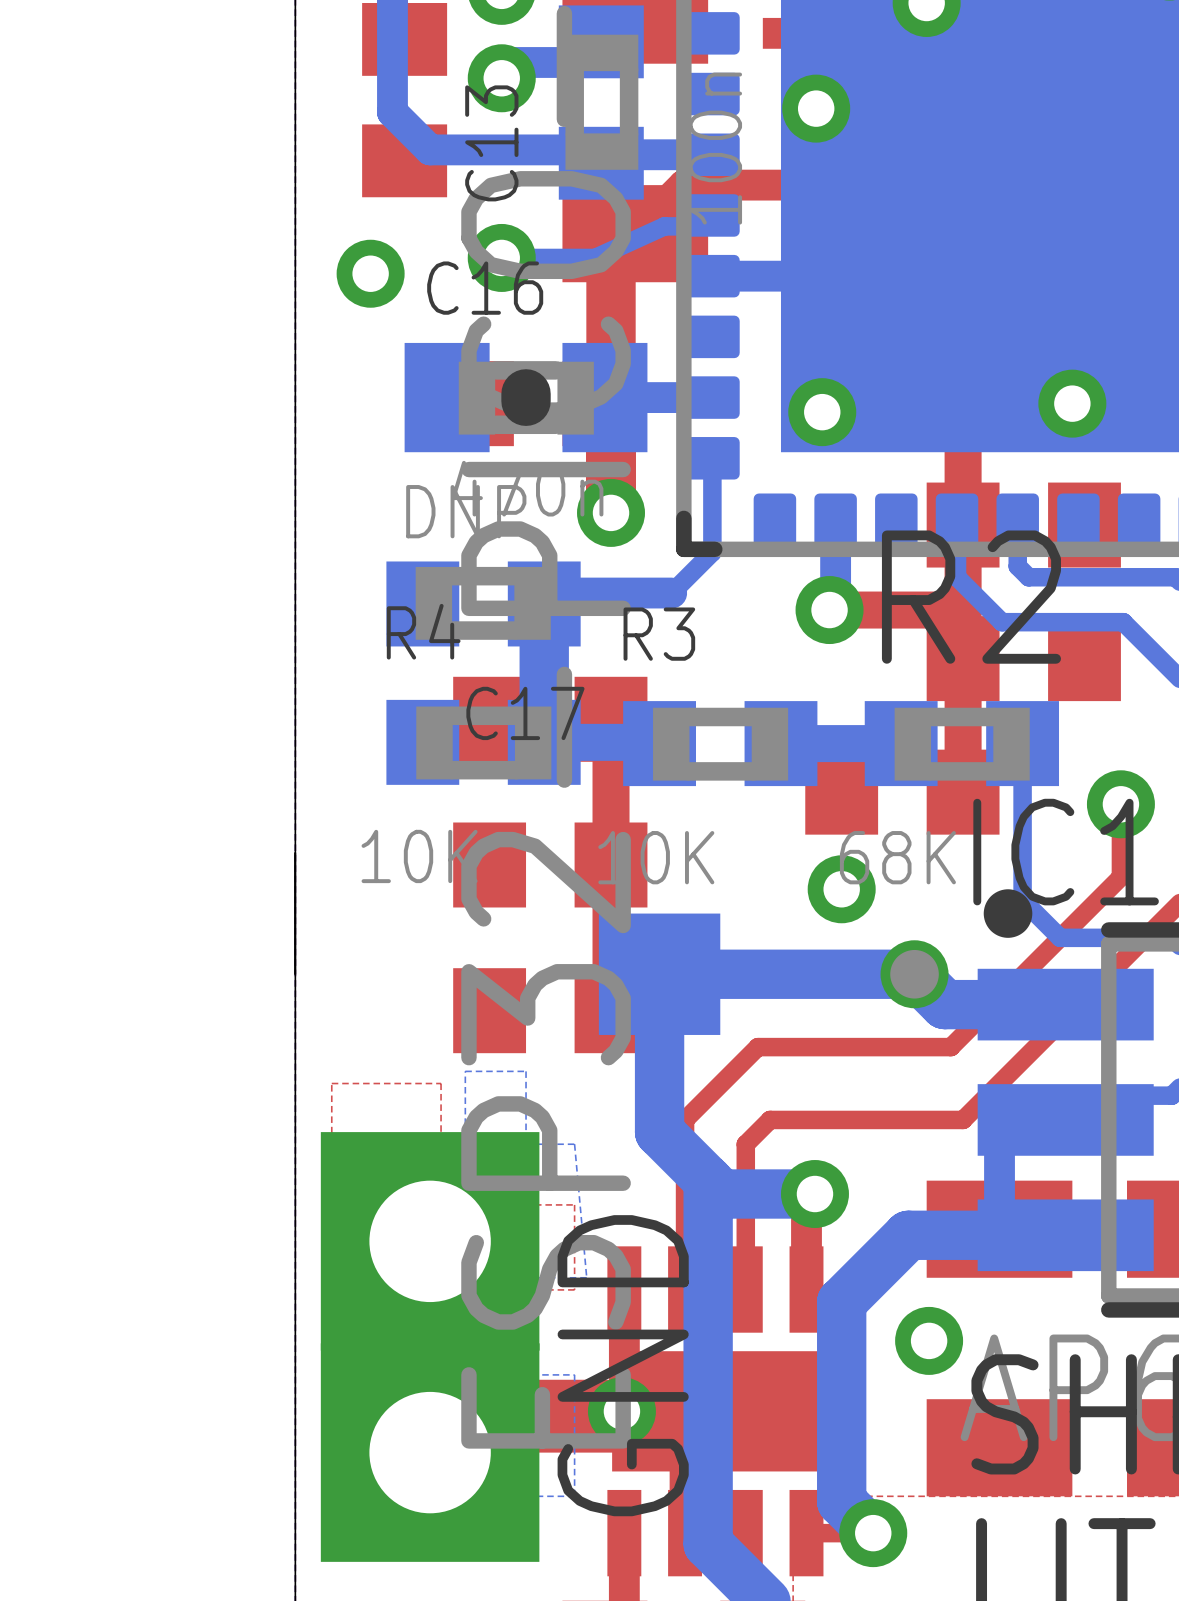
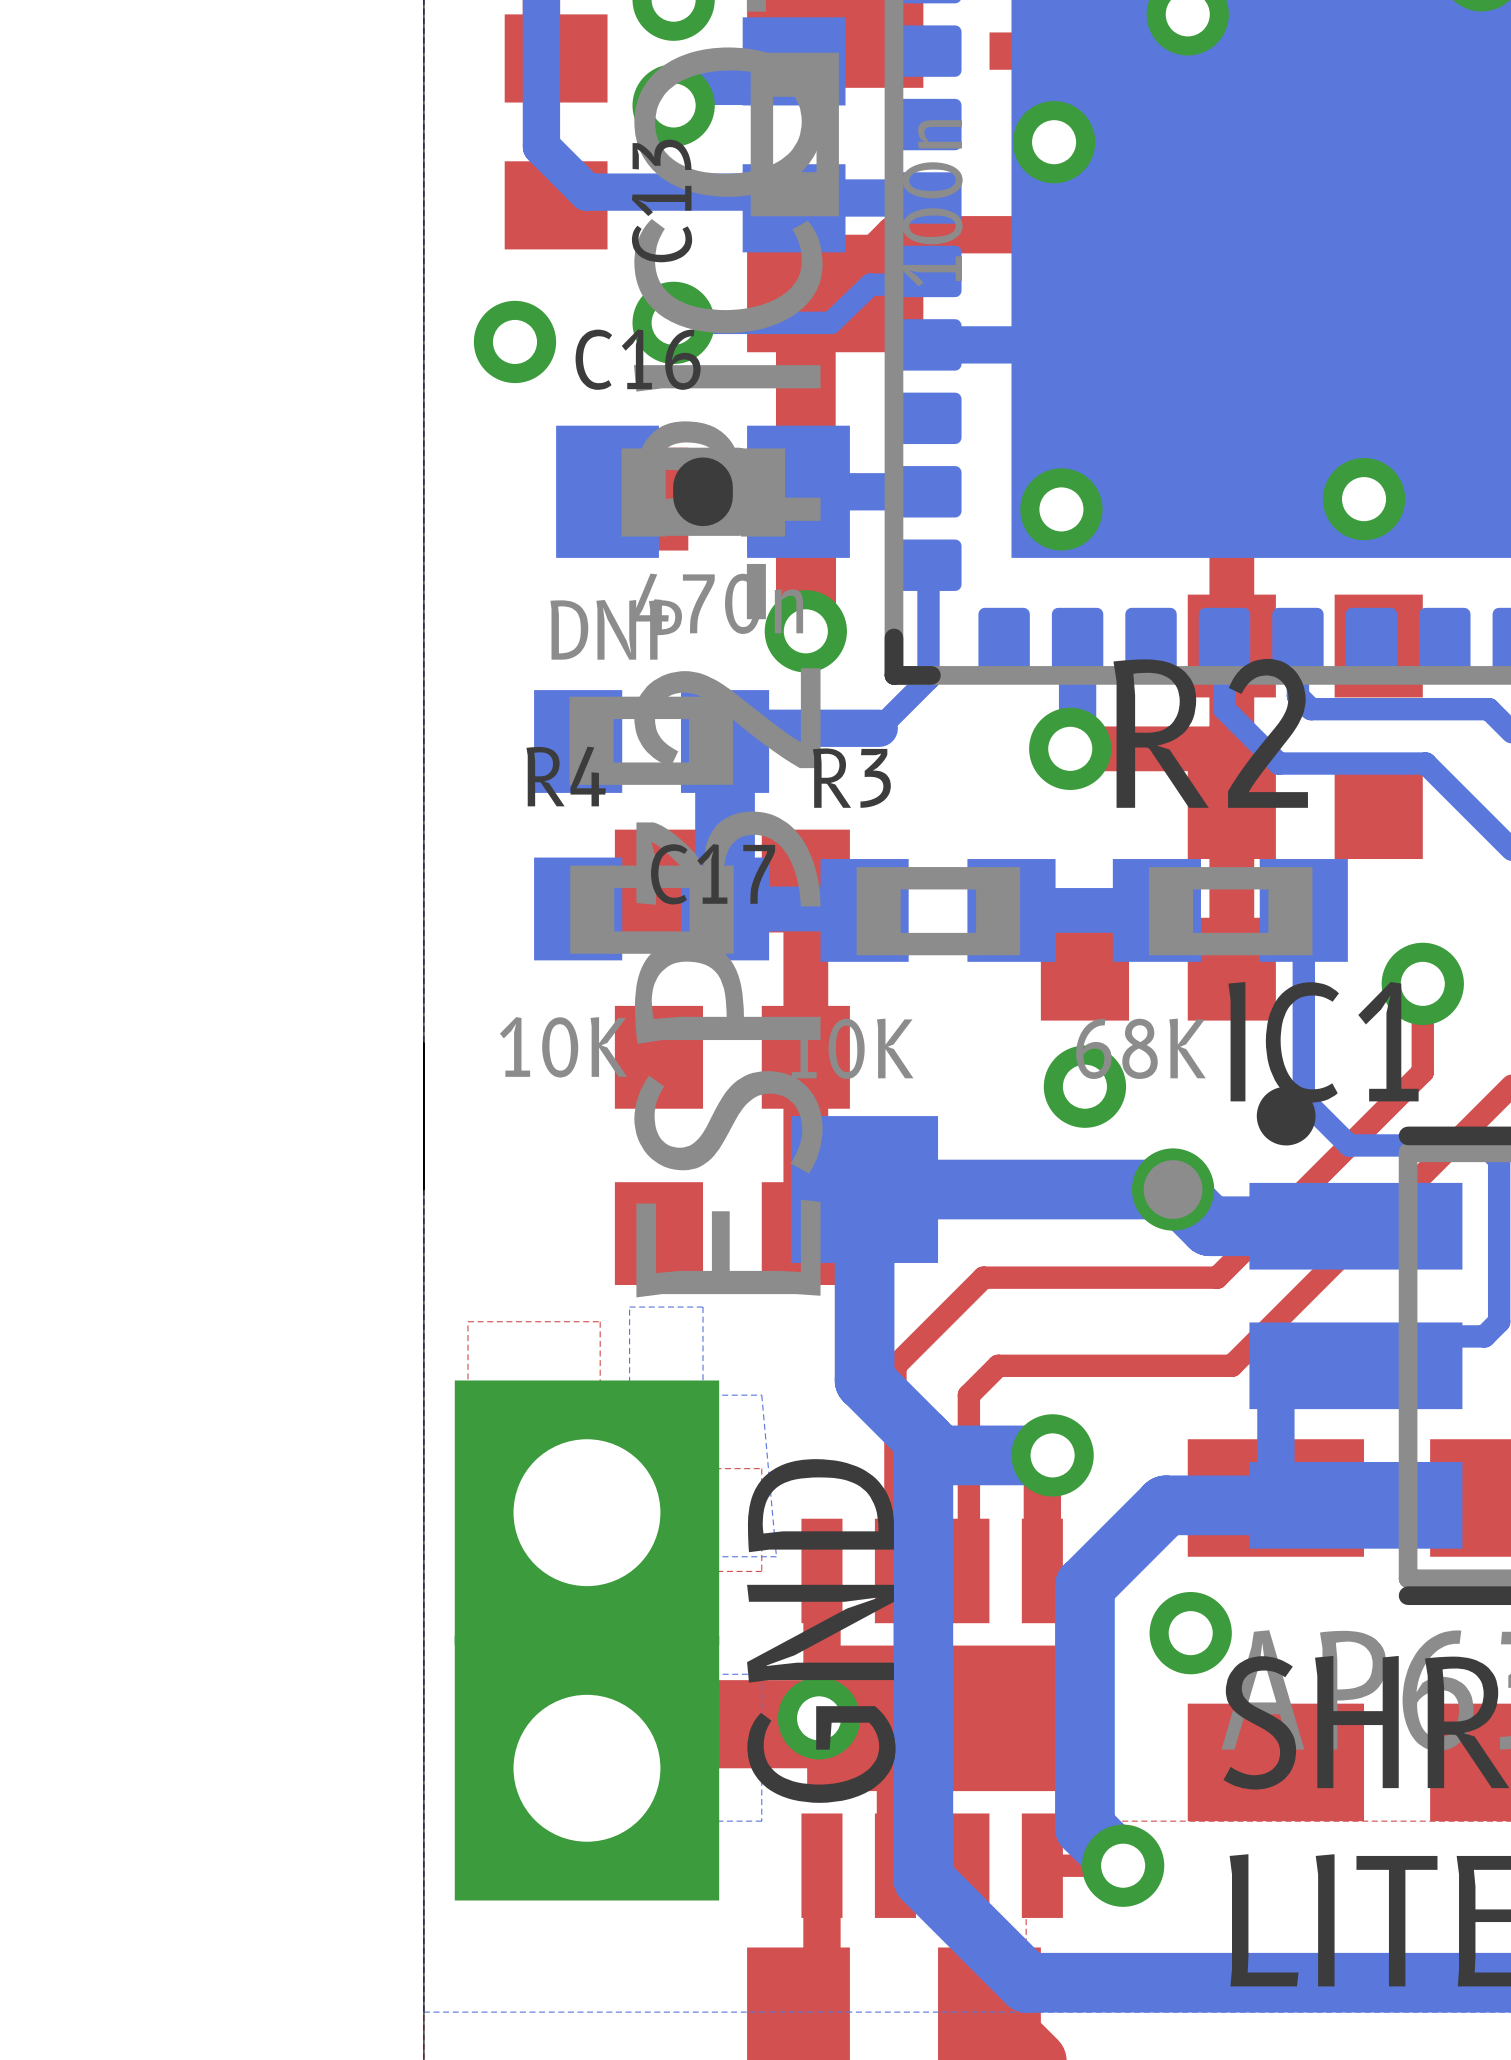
bottom track: (664, 226) (595, 257) -> (870, 284) (830, 322) (786, 322)

